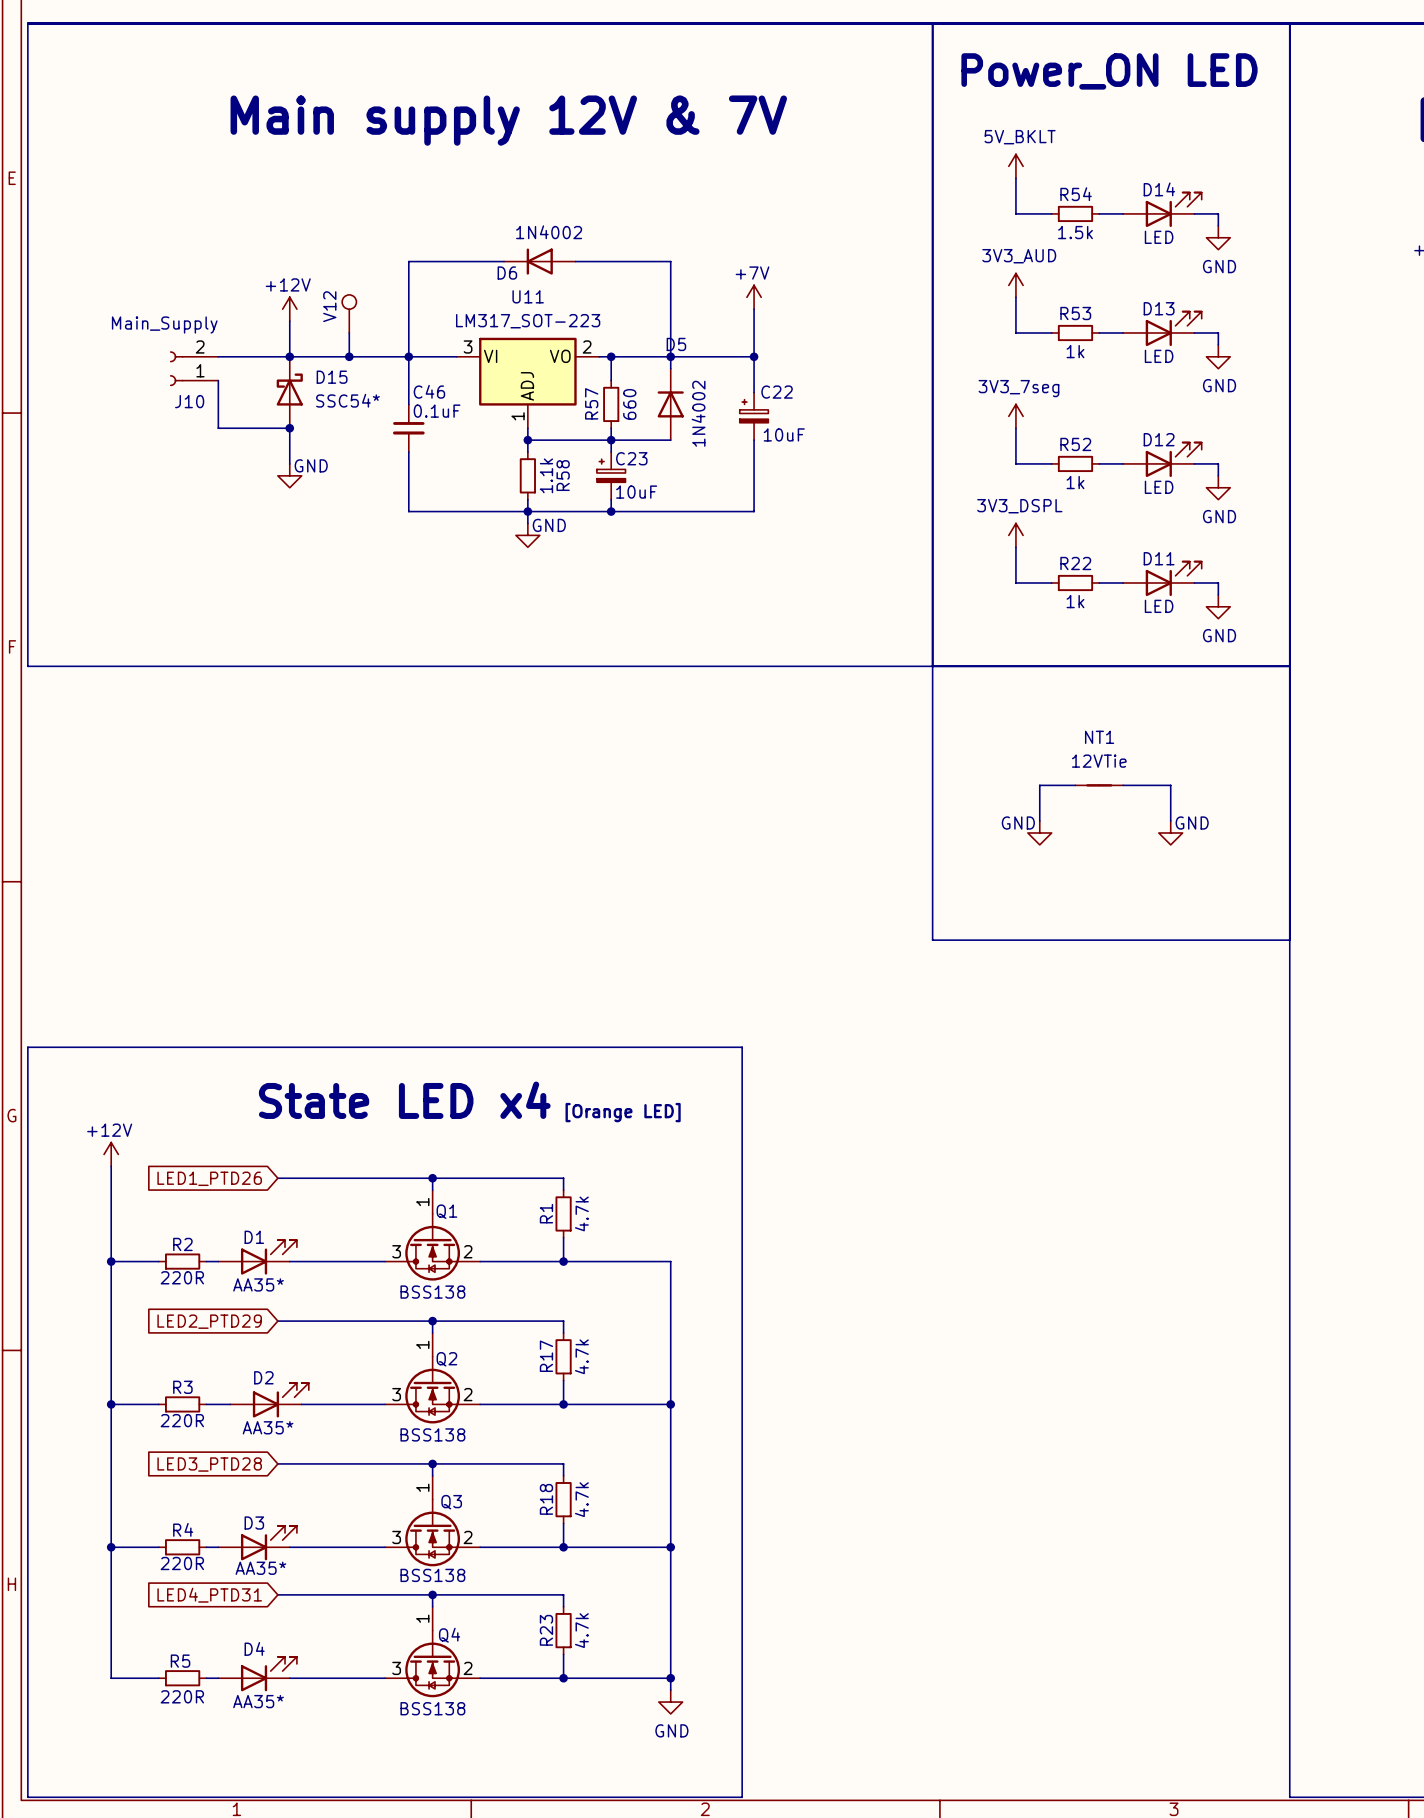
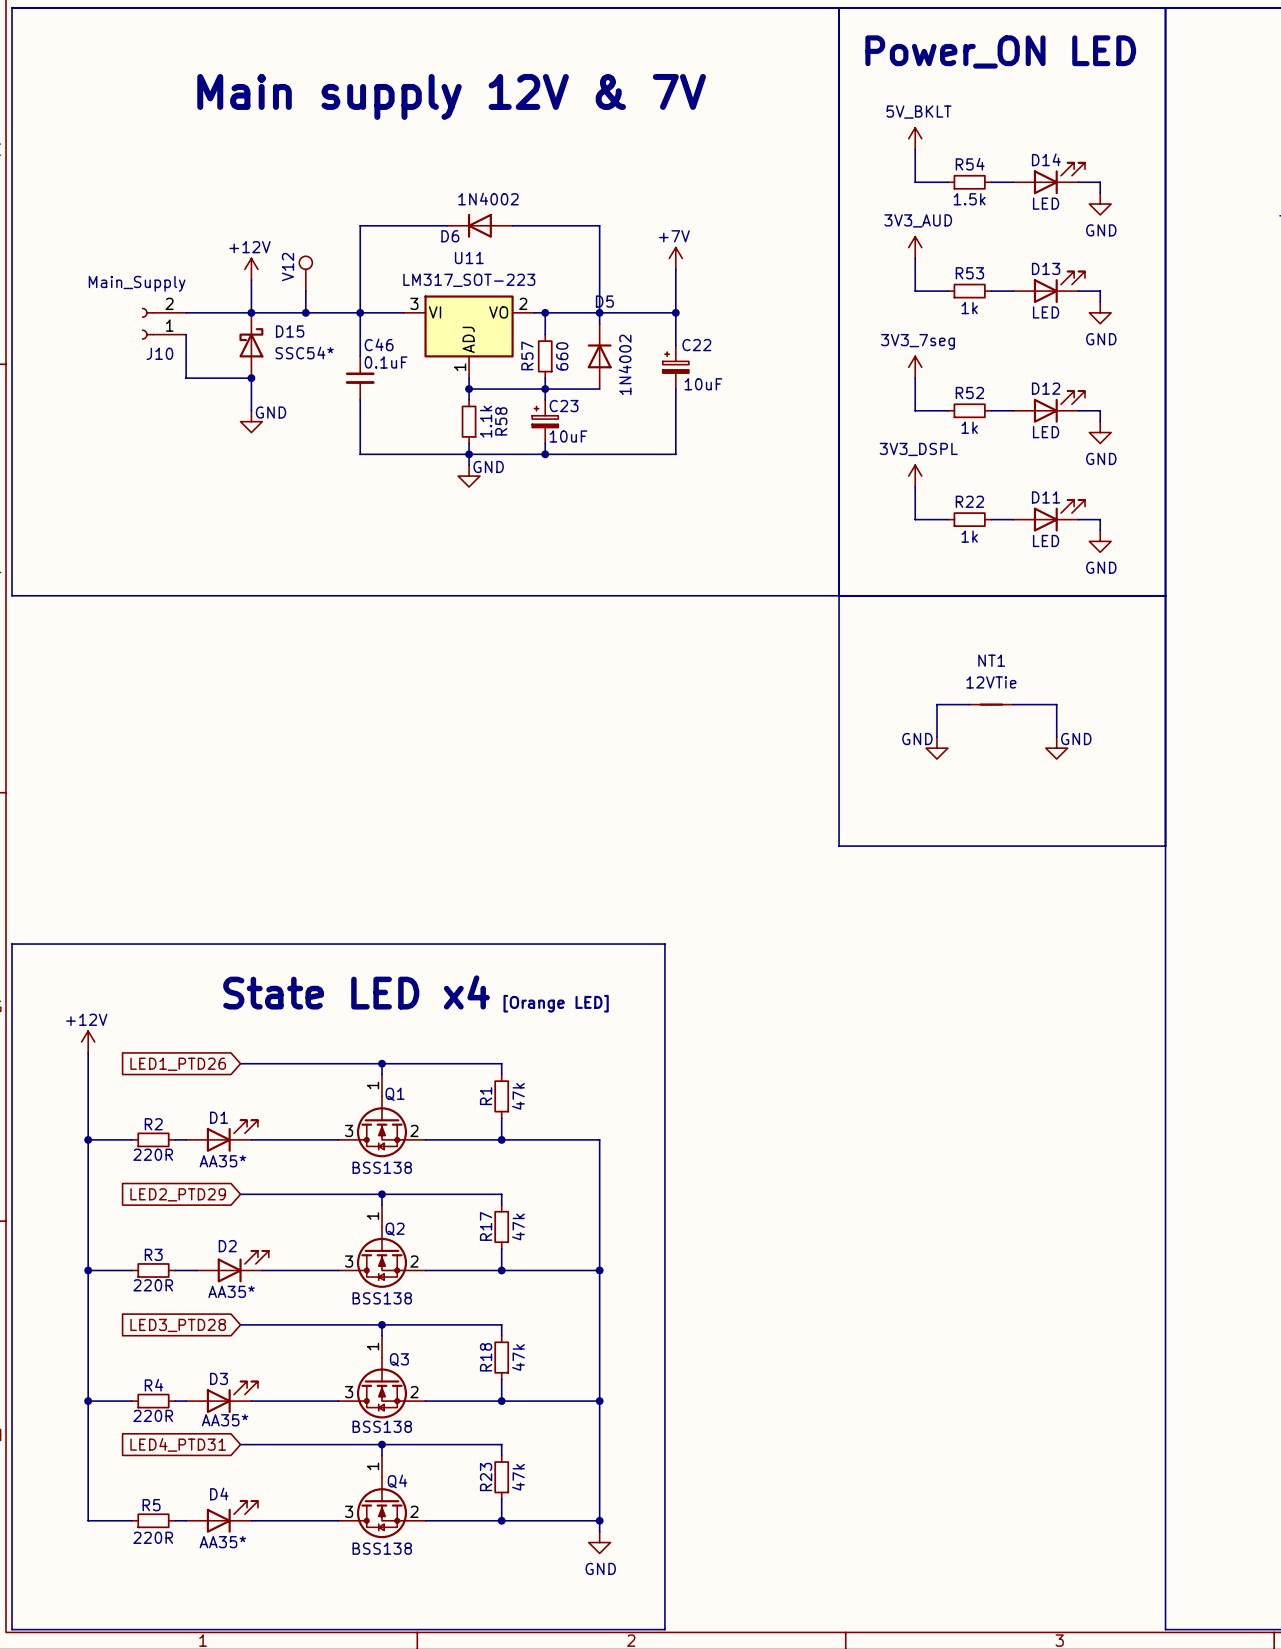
R1 value: 4.7k (581, 1213) -> 47k (518, 1096)
R17 value: 4.7k (581, 1356) -> 47k (518, 1226)
R18 value: 4.7k (581, 1499) -> 47k (518, 1357)
R23 value: 4.7k (581, 1630) -> 47k (518, 1477)

